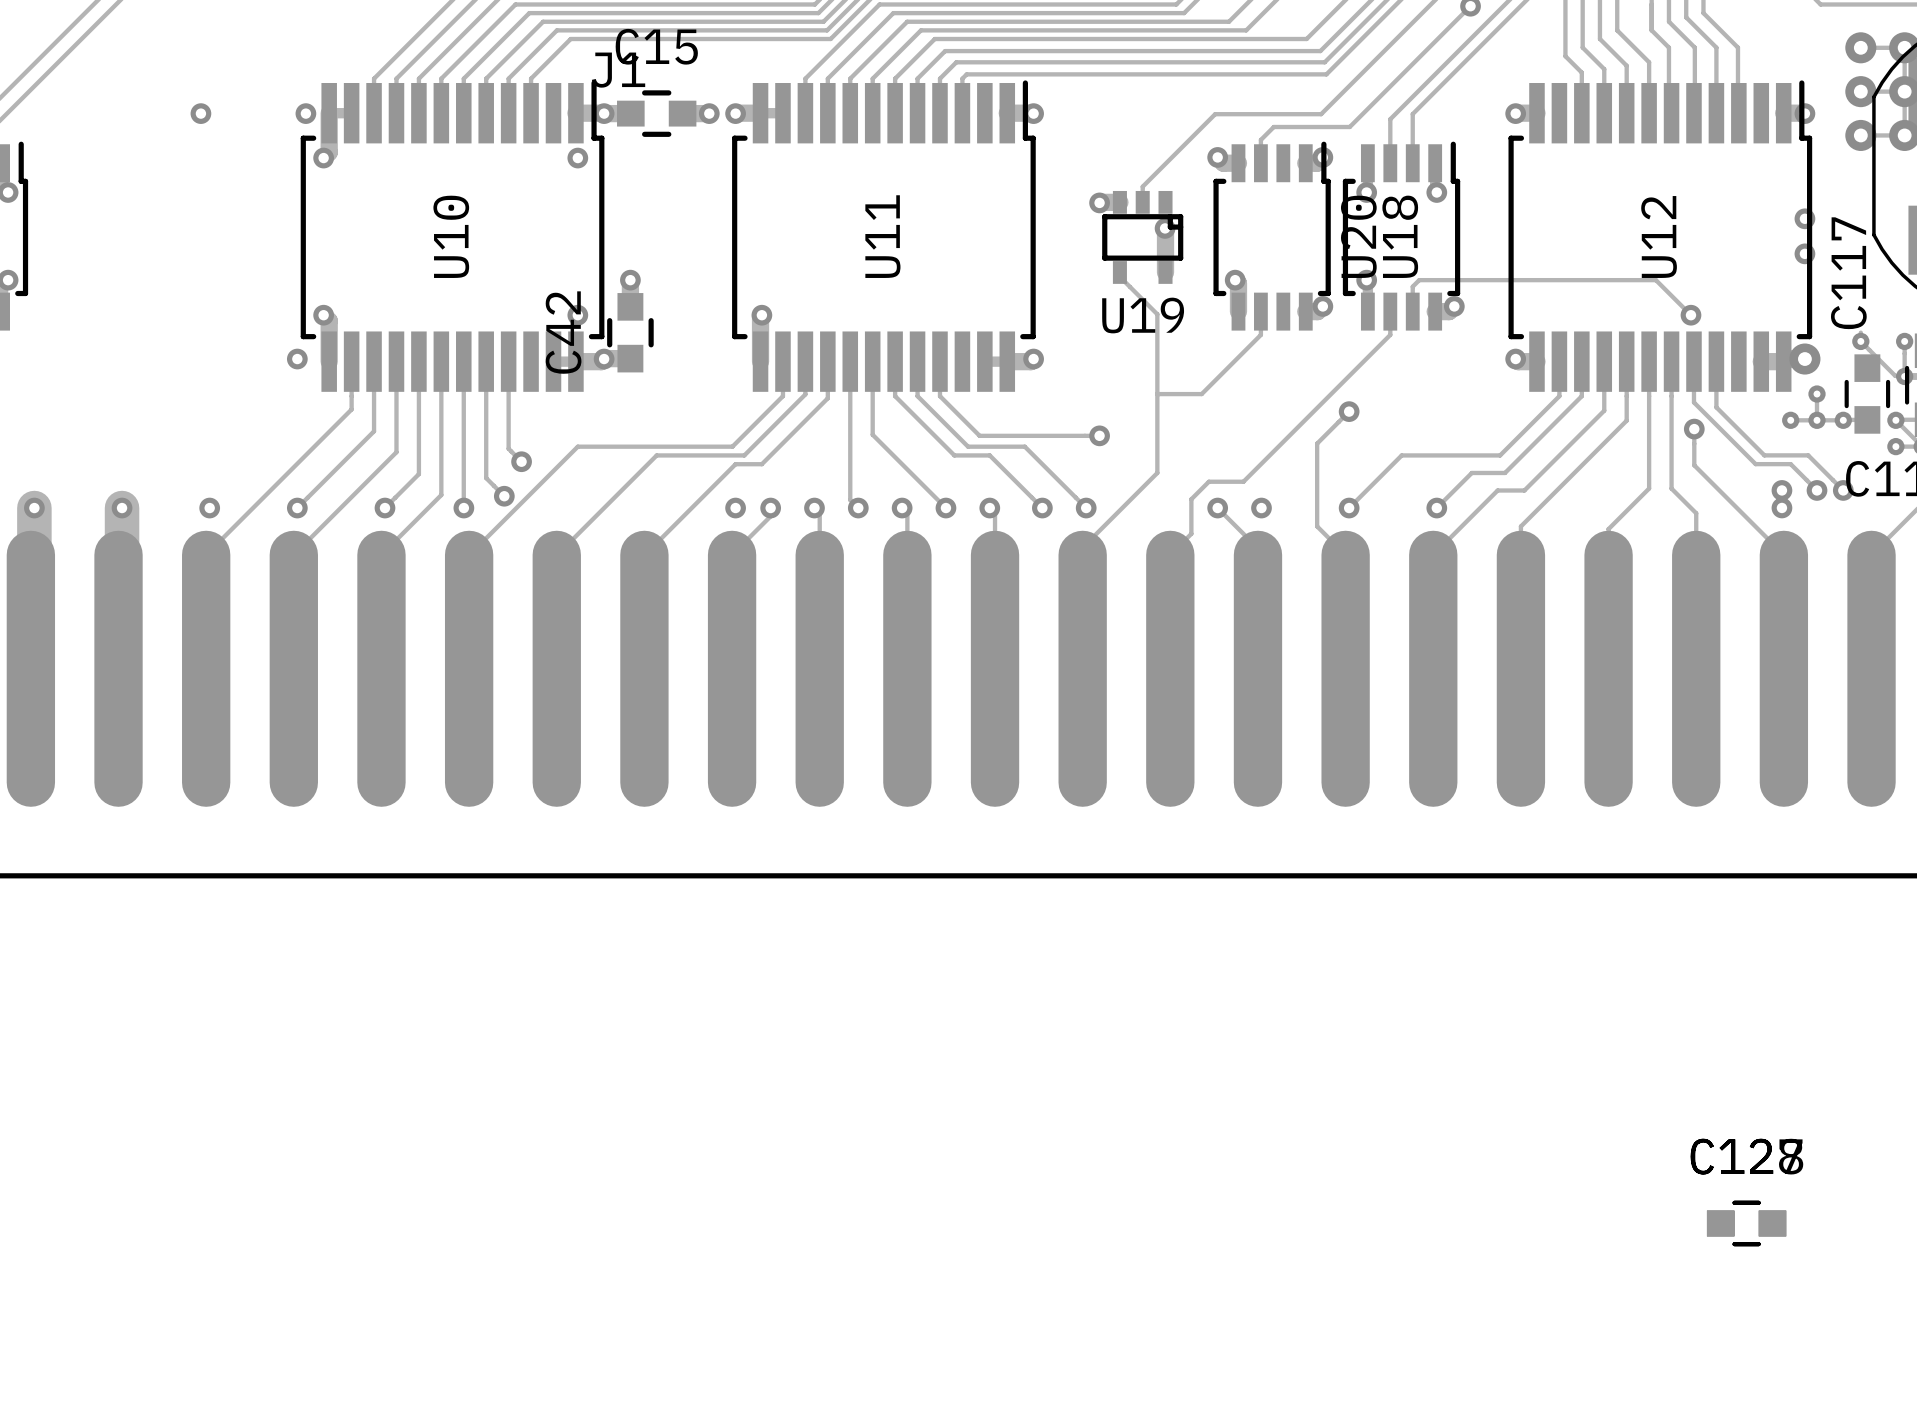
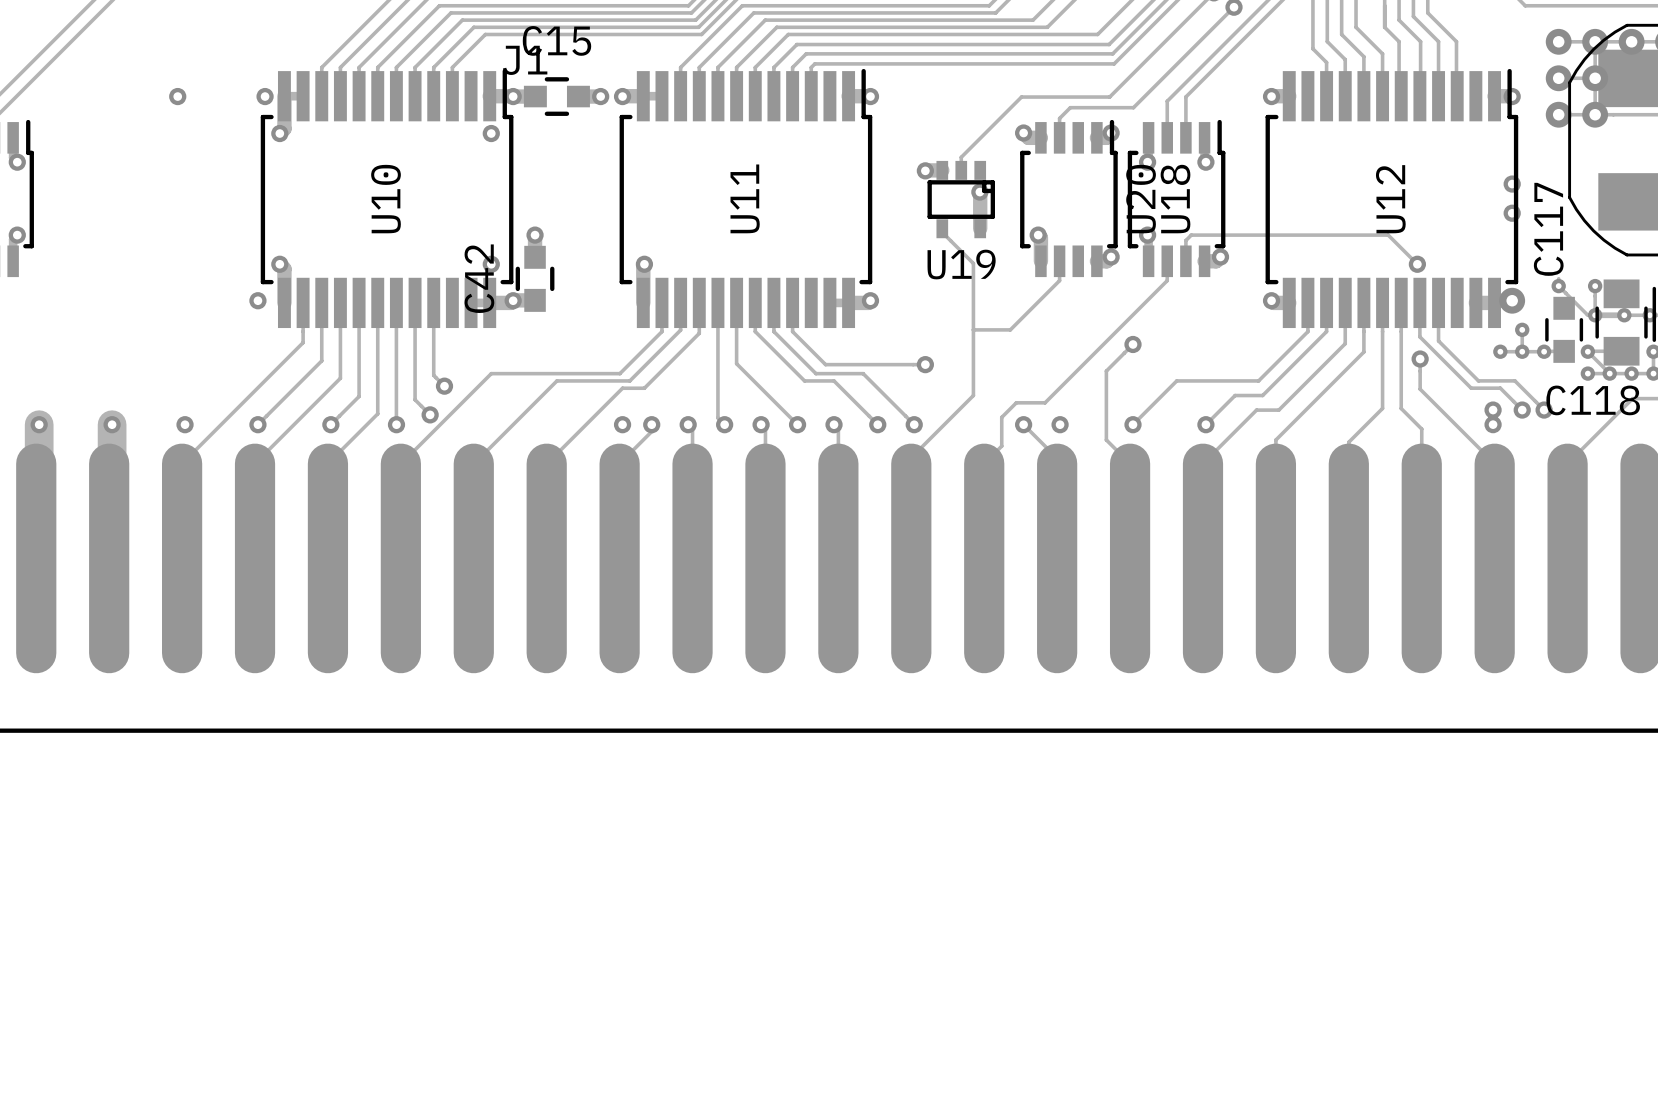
part: (1746, 1223) -> none
part: (1746, 1223) -> none

